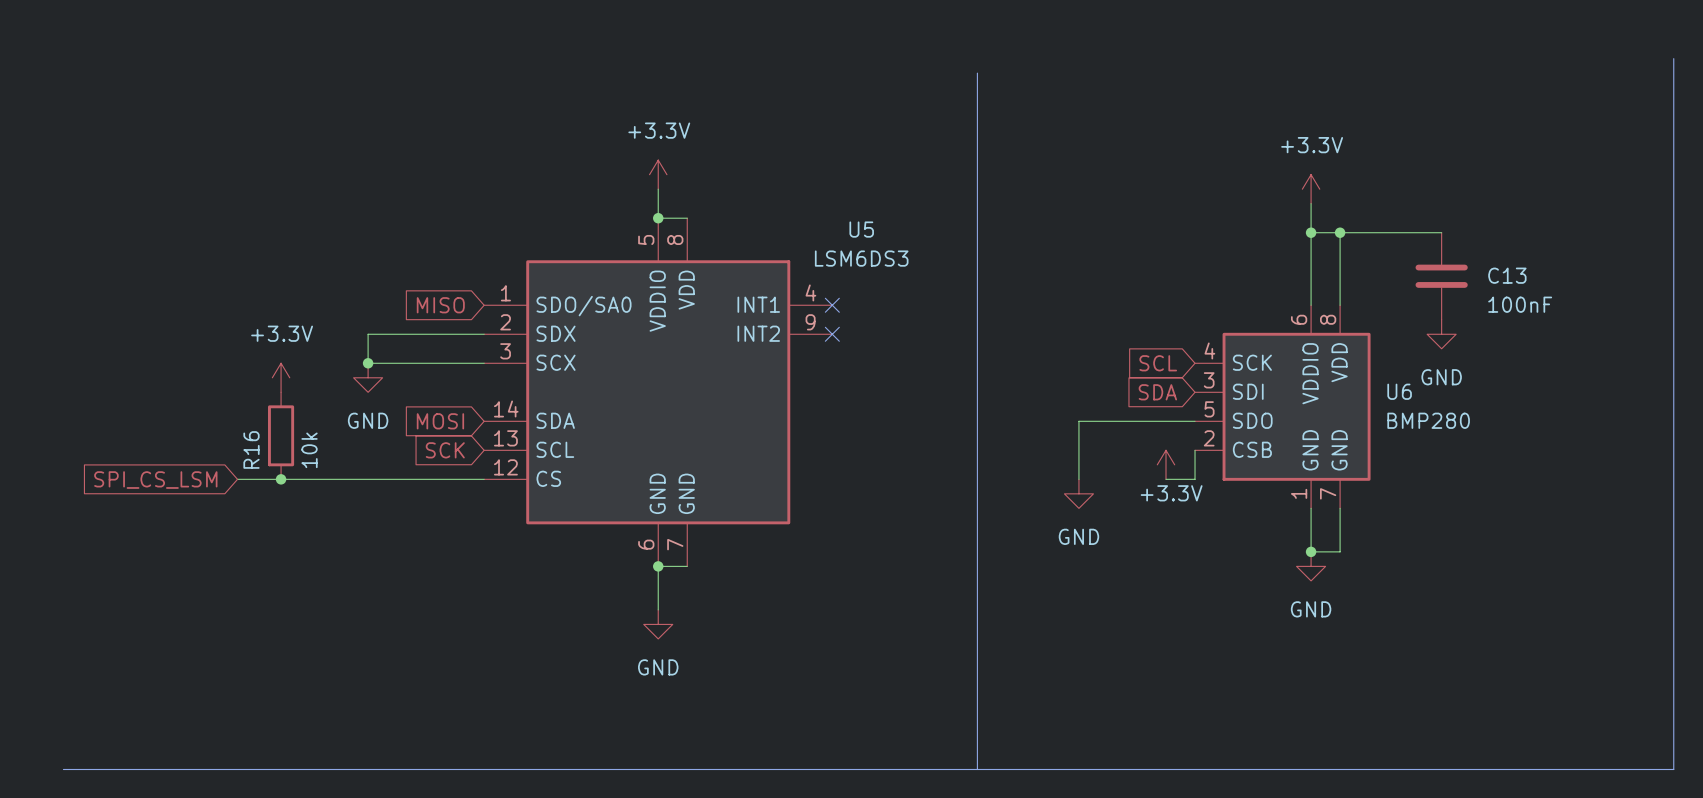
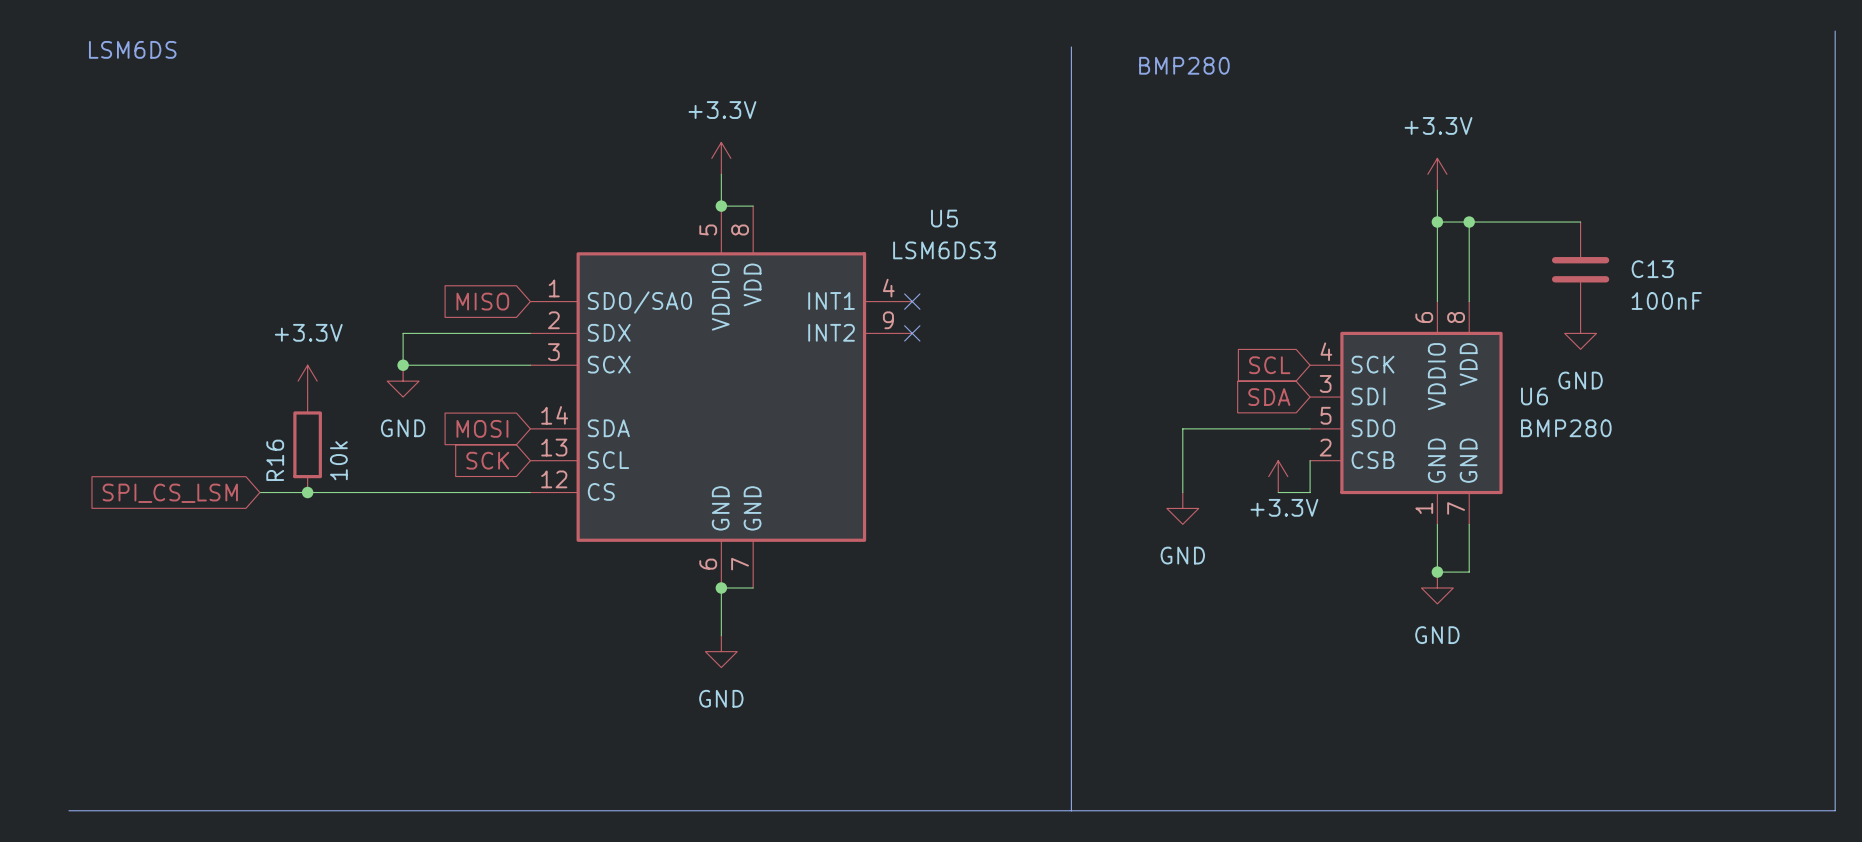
text: none -> LSM6DS (132, 49)
text: none -> BMP280 (1184, 65)

